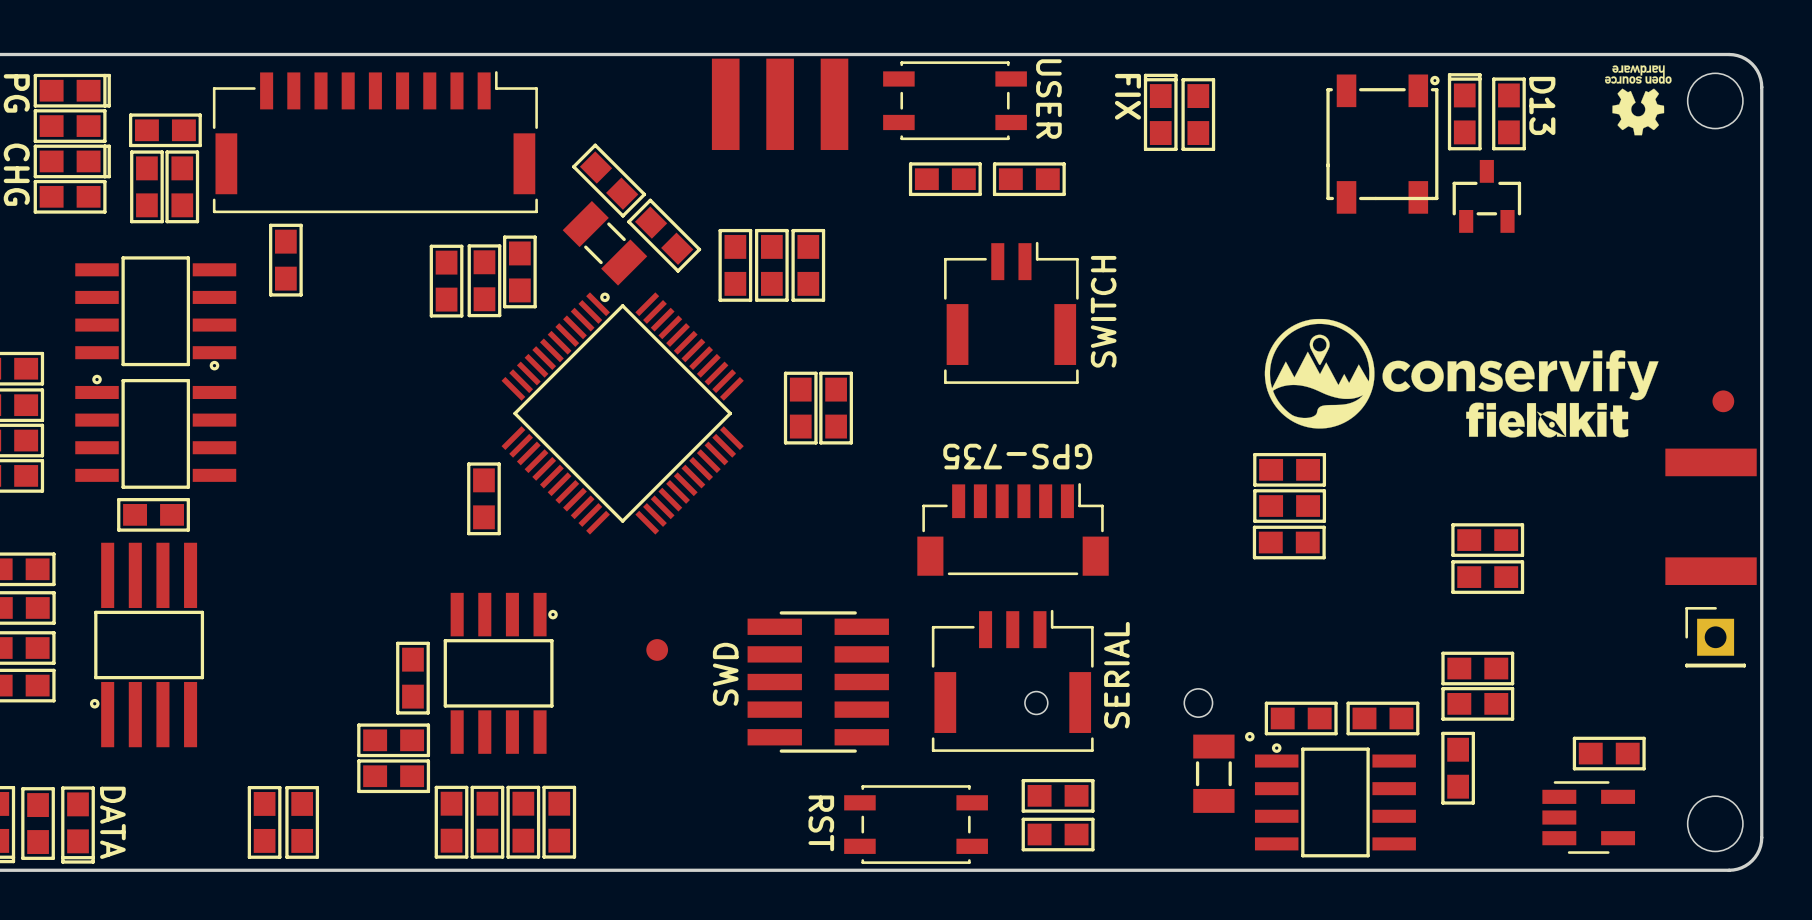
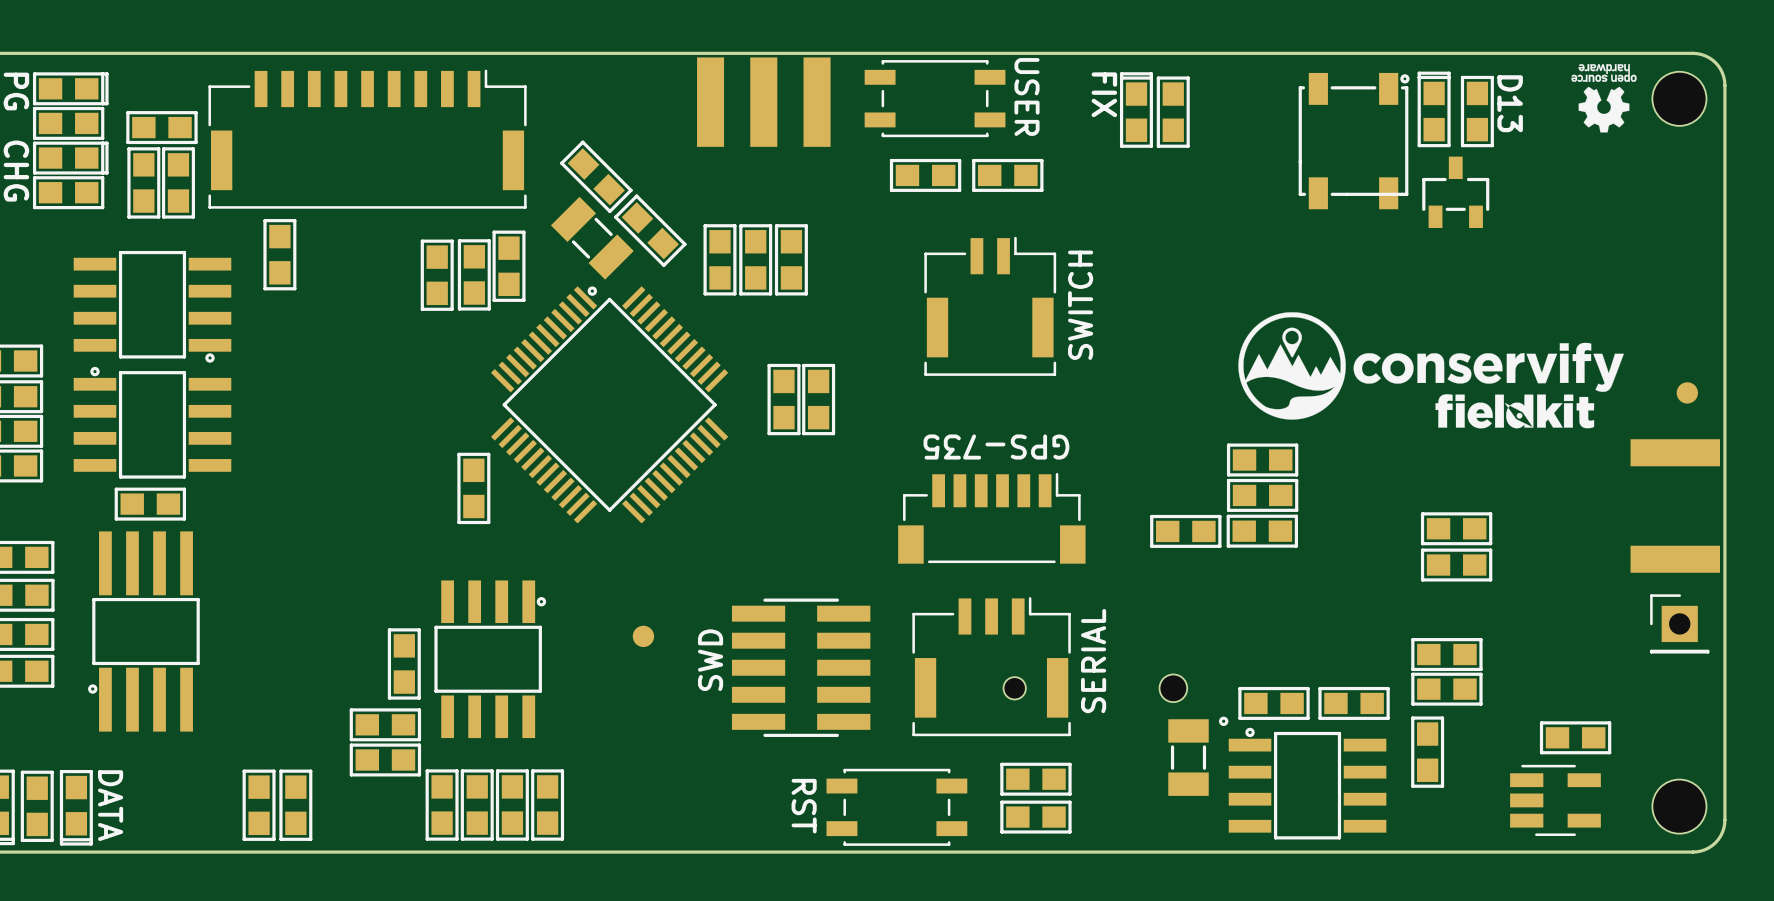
part: none -> (1185, 531)

